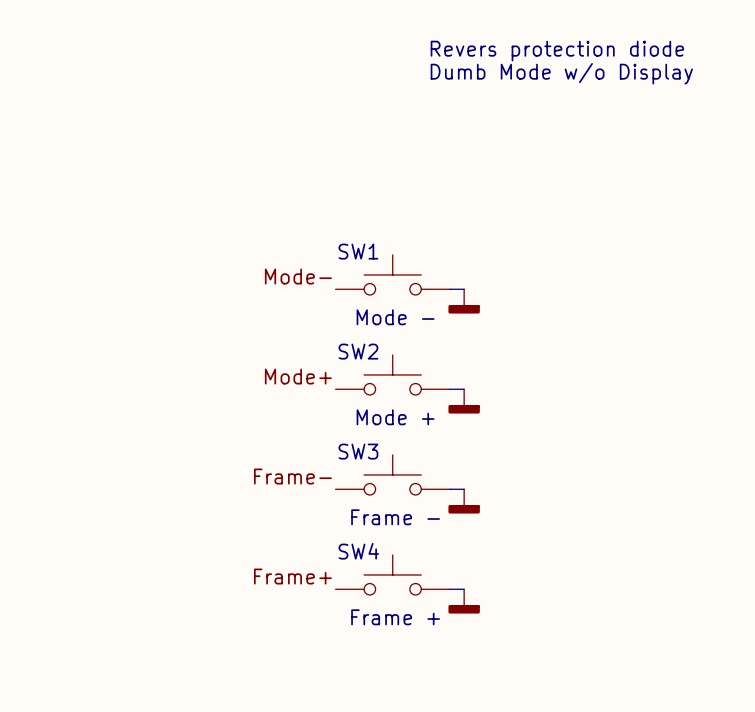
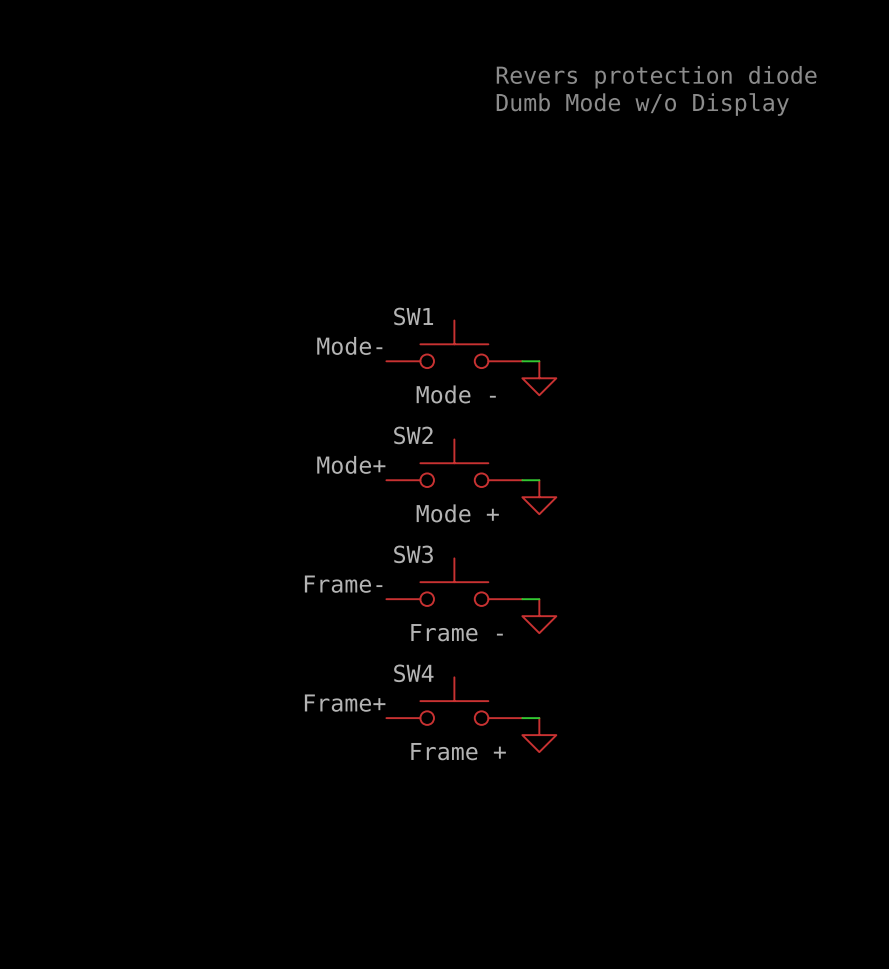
power symbol shape: [448, 289, 480, 314] -> [522, 361, 557, 396]
power symbol shape: [448, 389, 480, 414] -> [522, 480, 557, 515]
power symbol shape: [448, 489, 480, 514] -> [522, 599, 557, 634]
power symbol shape: [448, 589, 480, 614] -> [522, 718, 557, 753]

